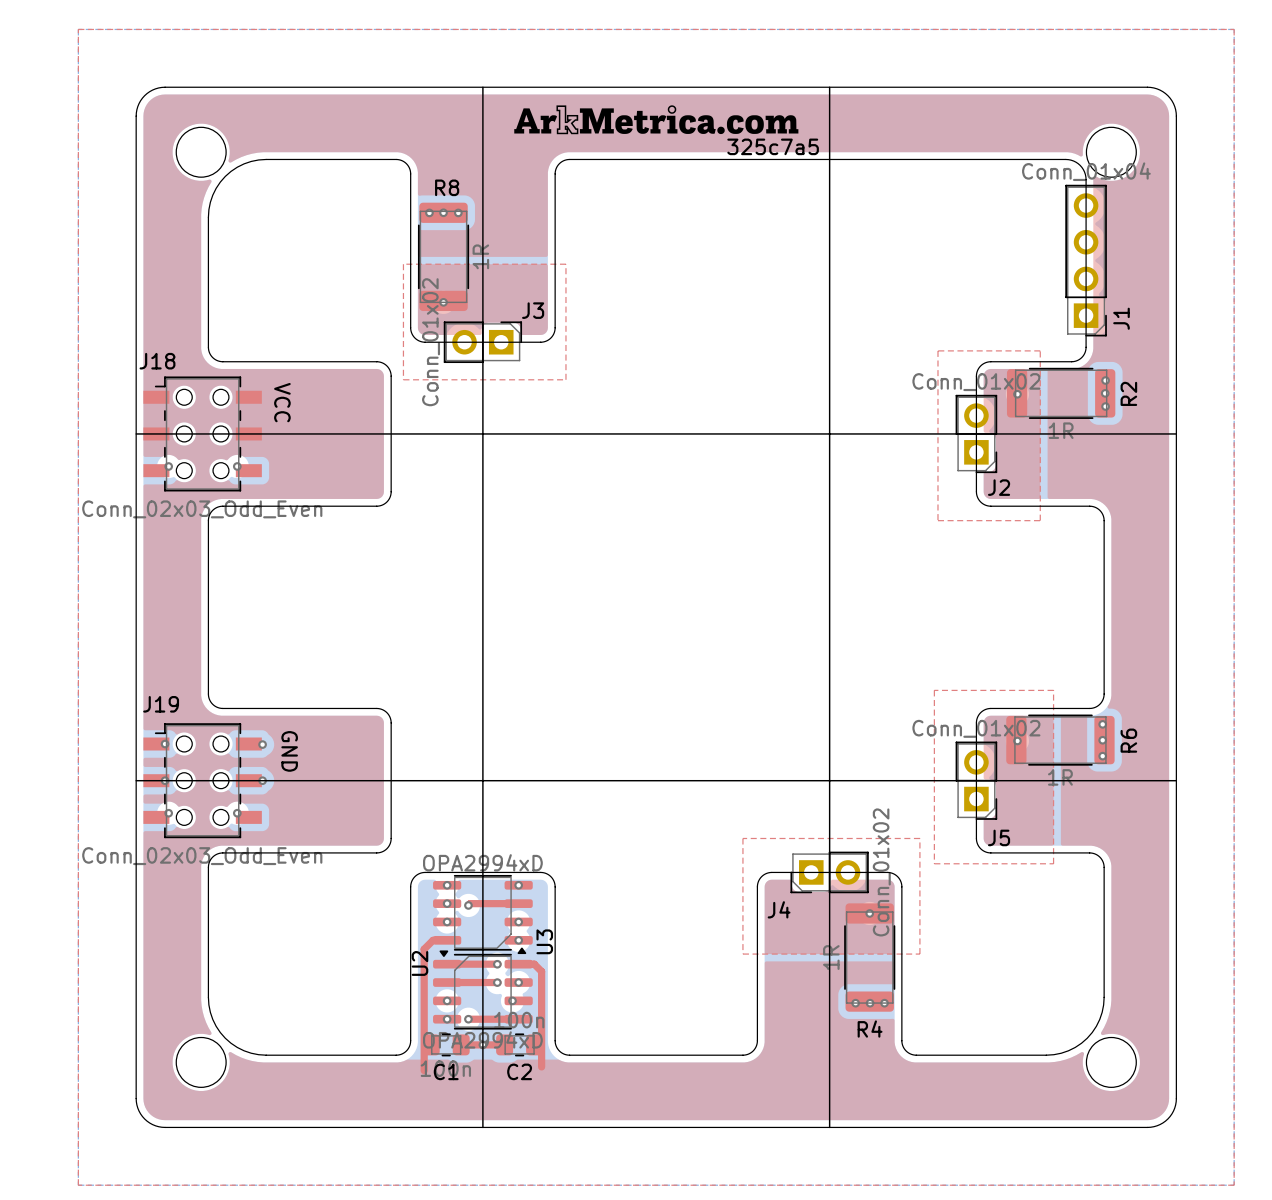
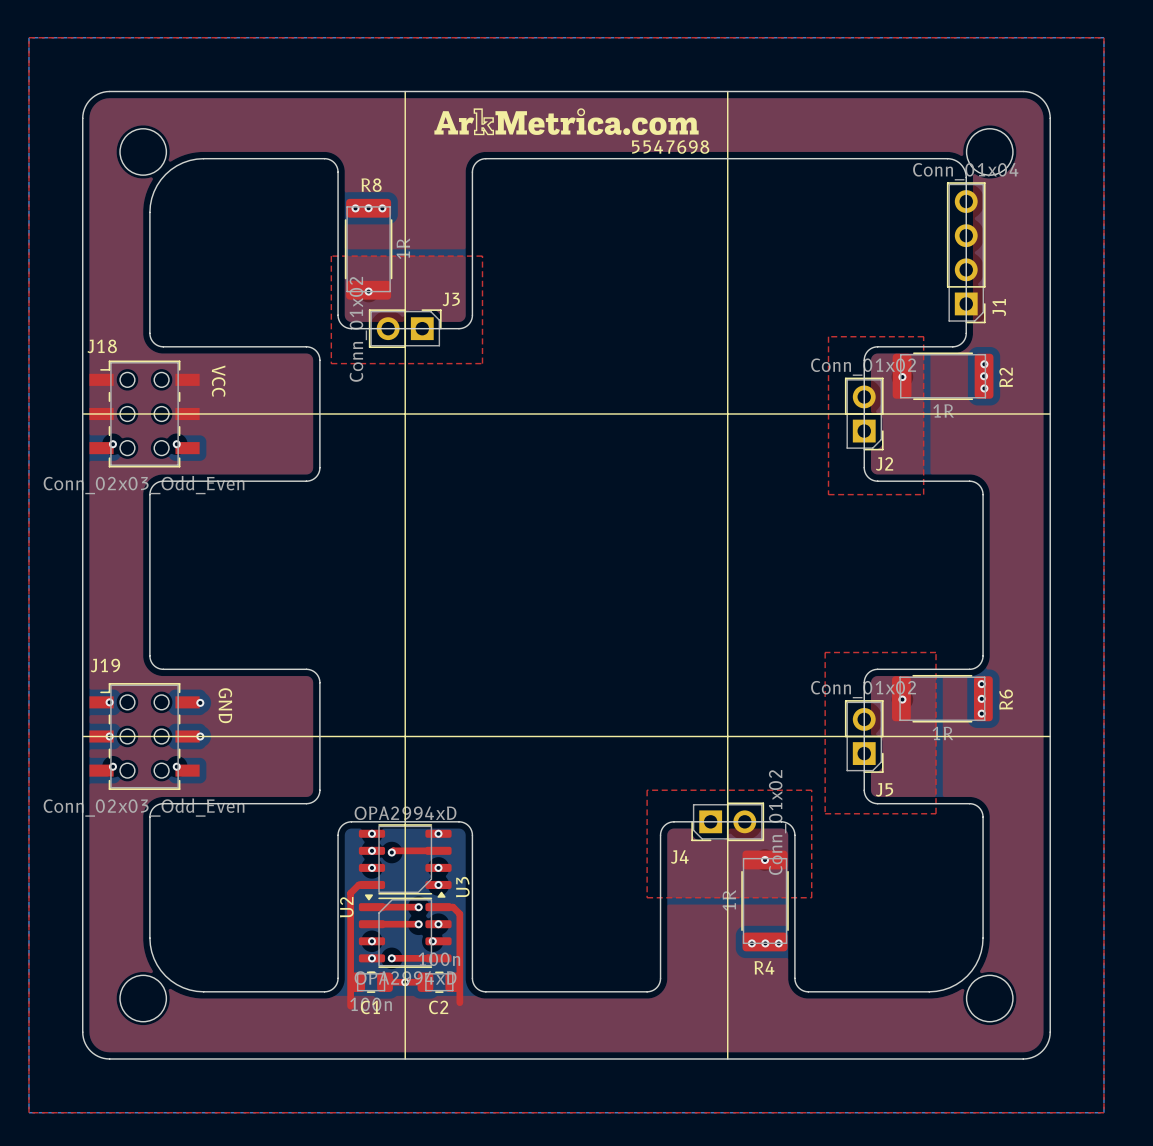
text: 325c7a5 (773, 146) -> 5547698 (670, 147)

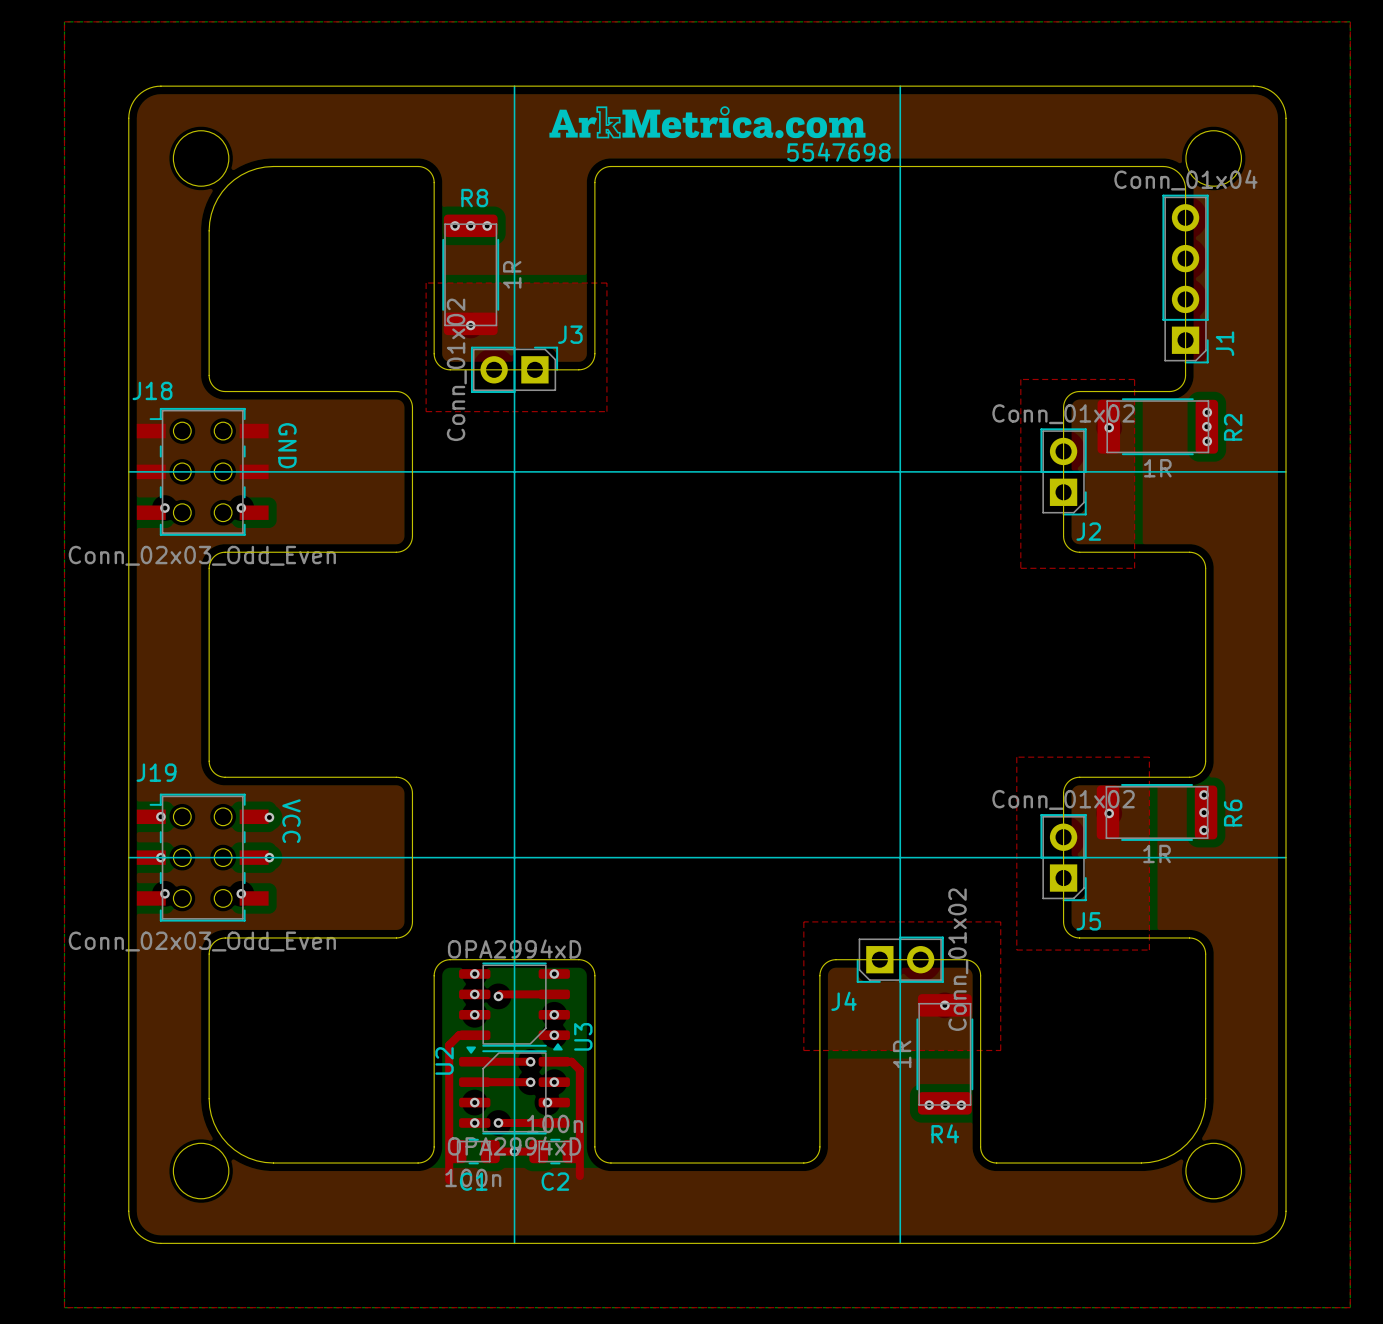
text: VCC (218, 381) -> GND (287, 445)
text: GND (225, 705) -> VCC (291, 821)

